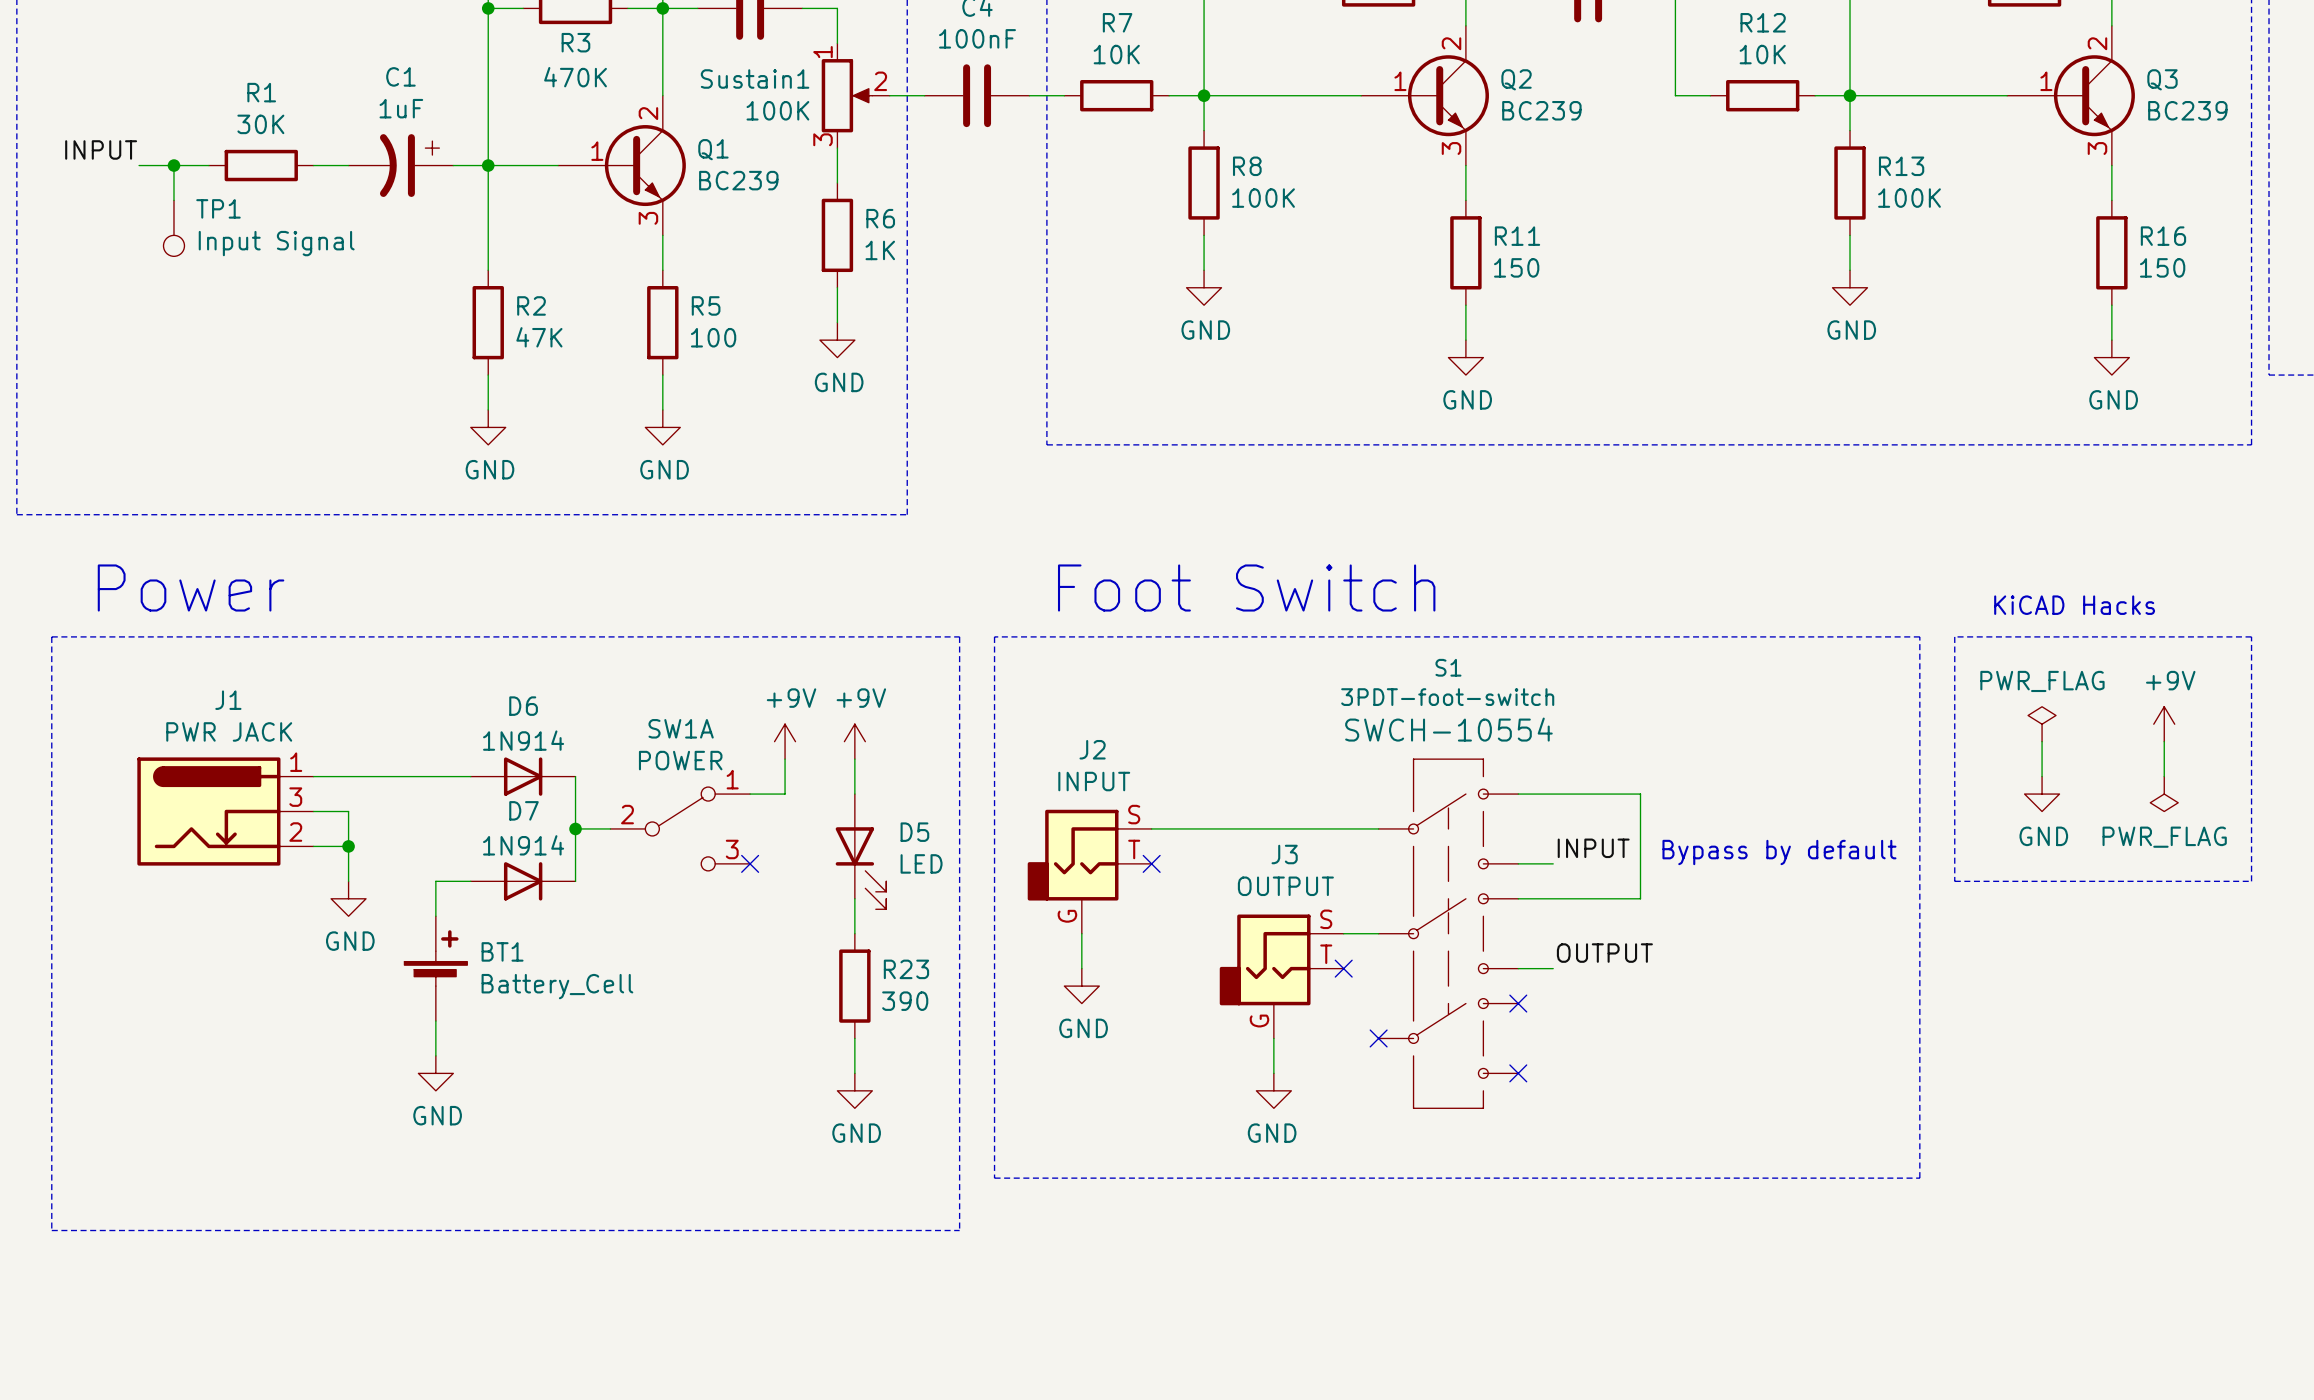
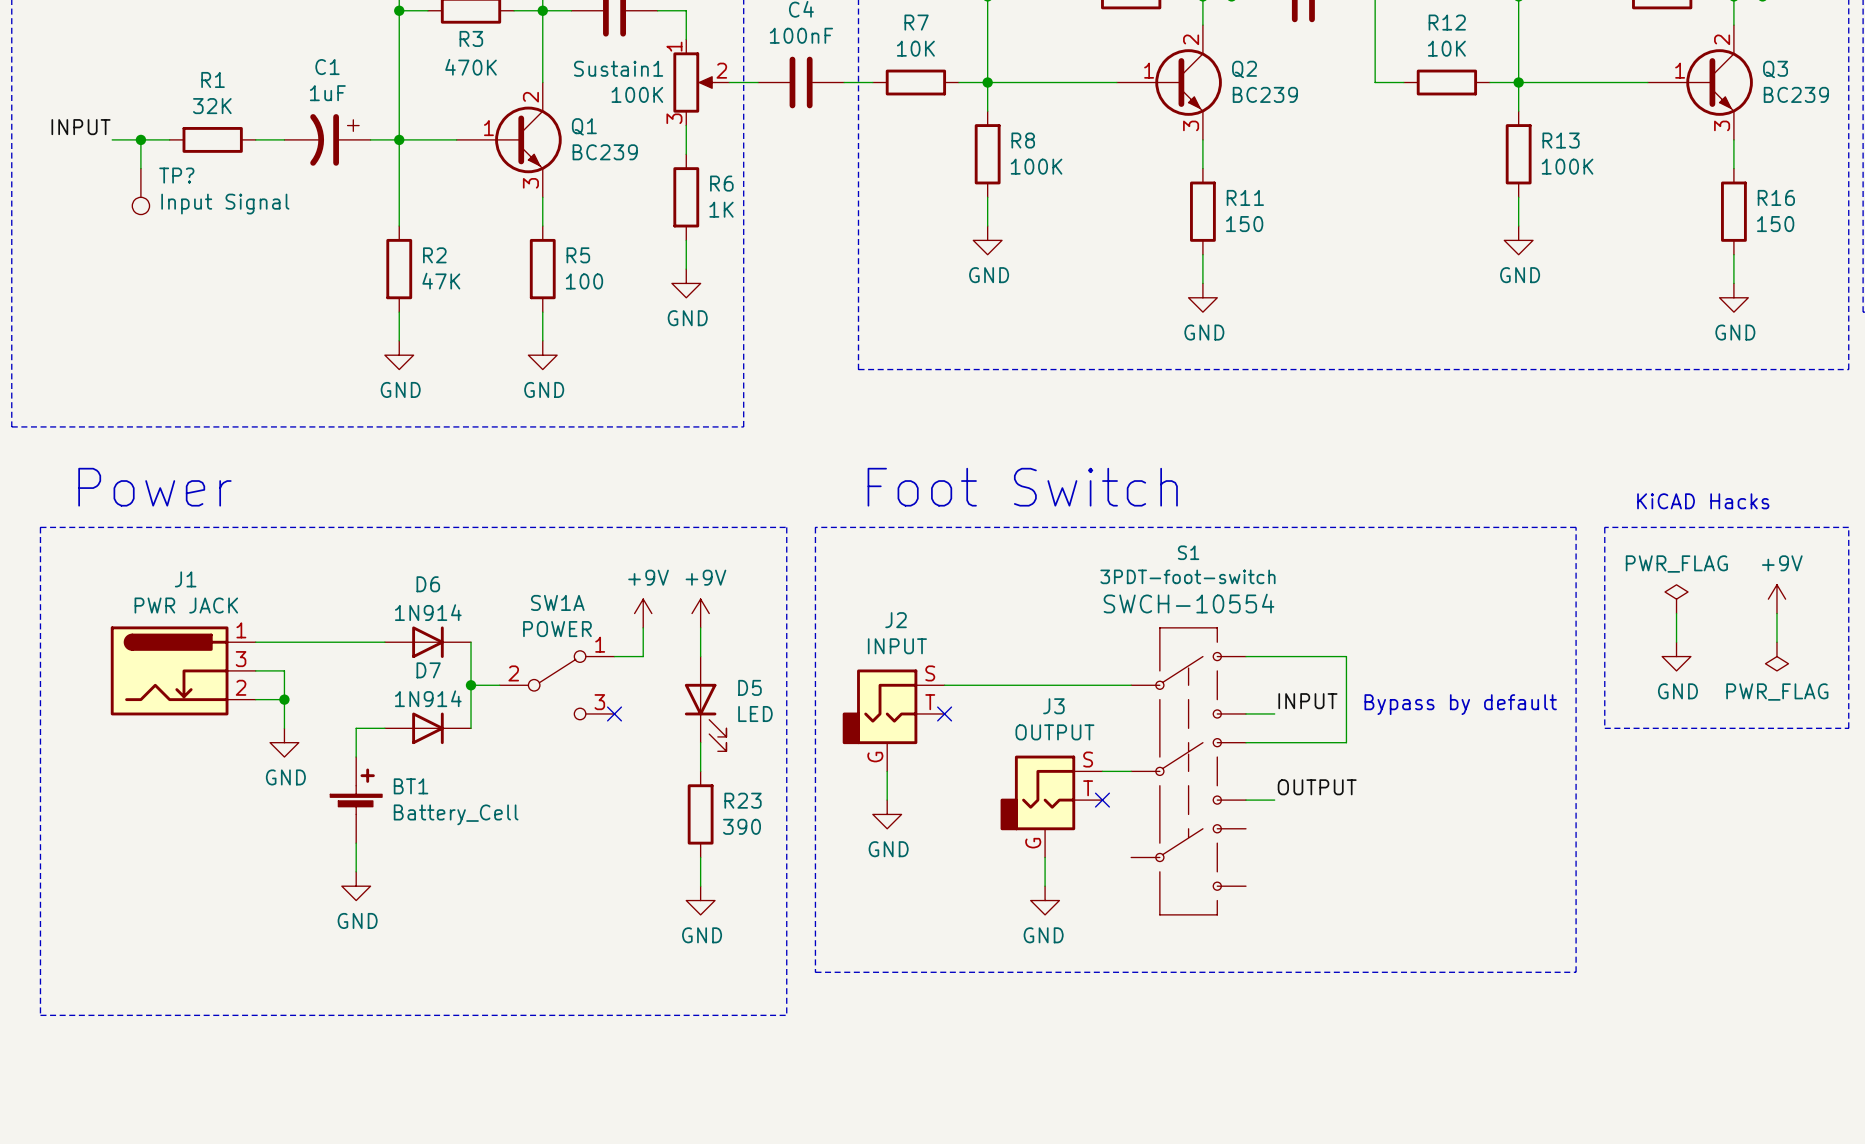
R1 value: 30K (260, 124) -> 32K (212, 106)
TP1 name: TP1 (218, 208) -> TP? (176, 175)
no-connect mark: (1518, 1003) -> none
no-connect mark: (1378, 1038) -> none
no-connect mark: (1518, 1073) -> none

